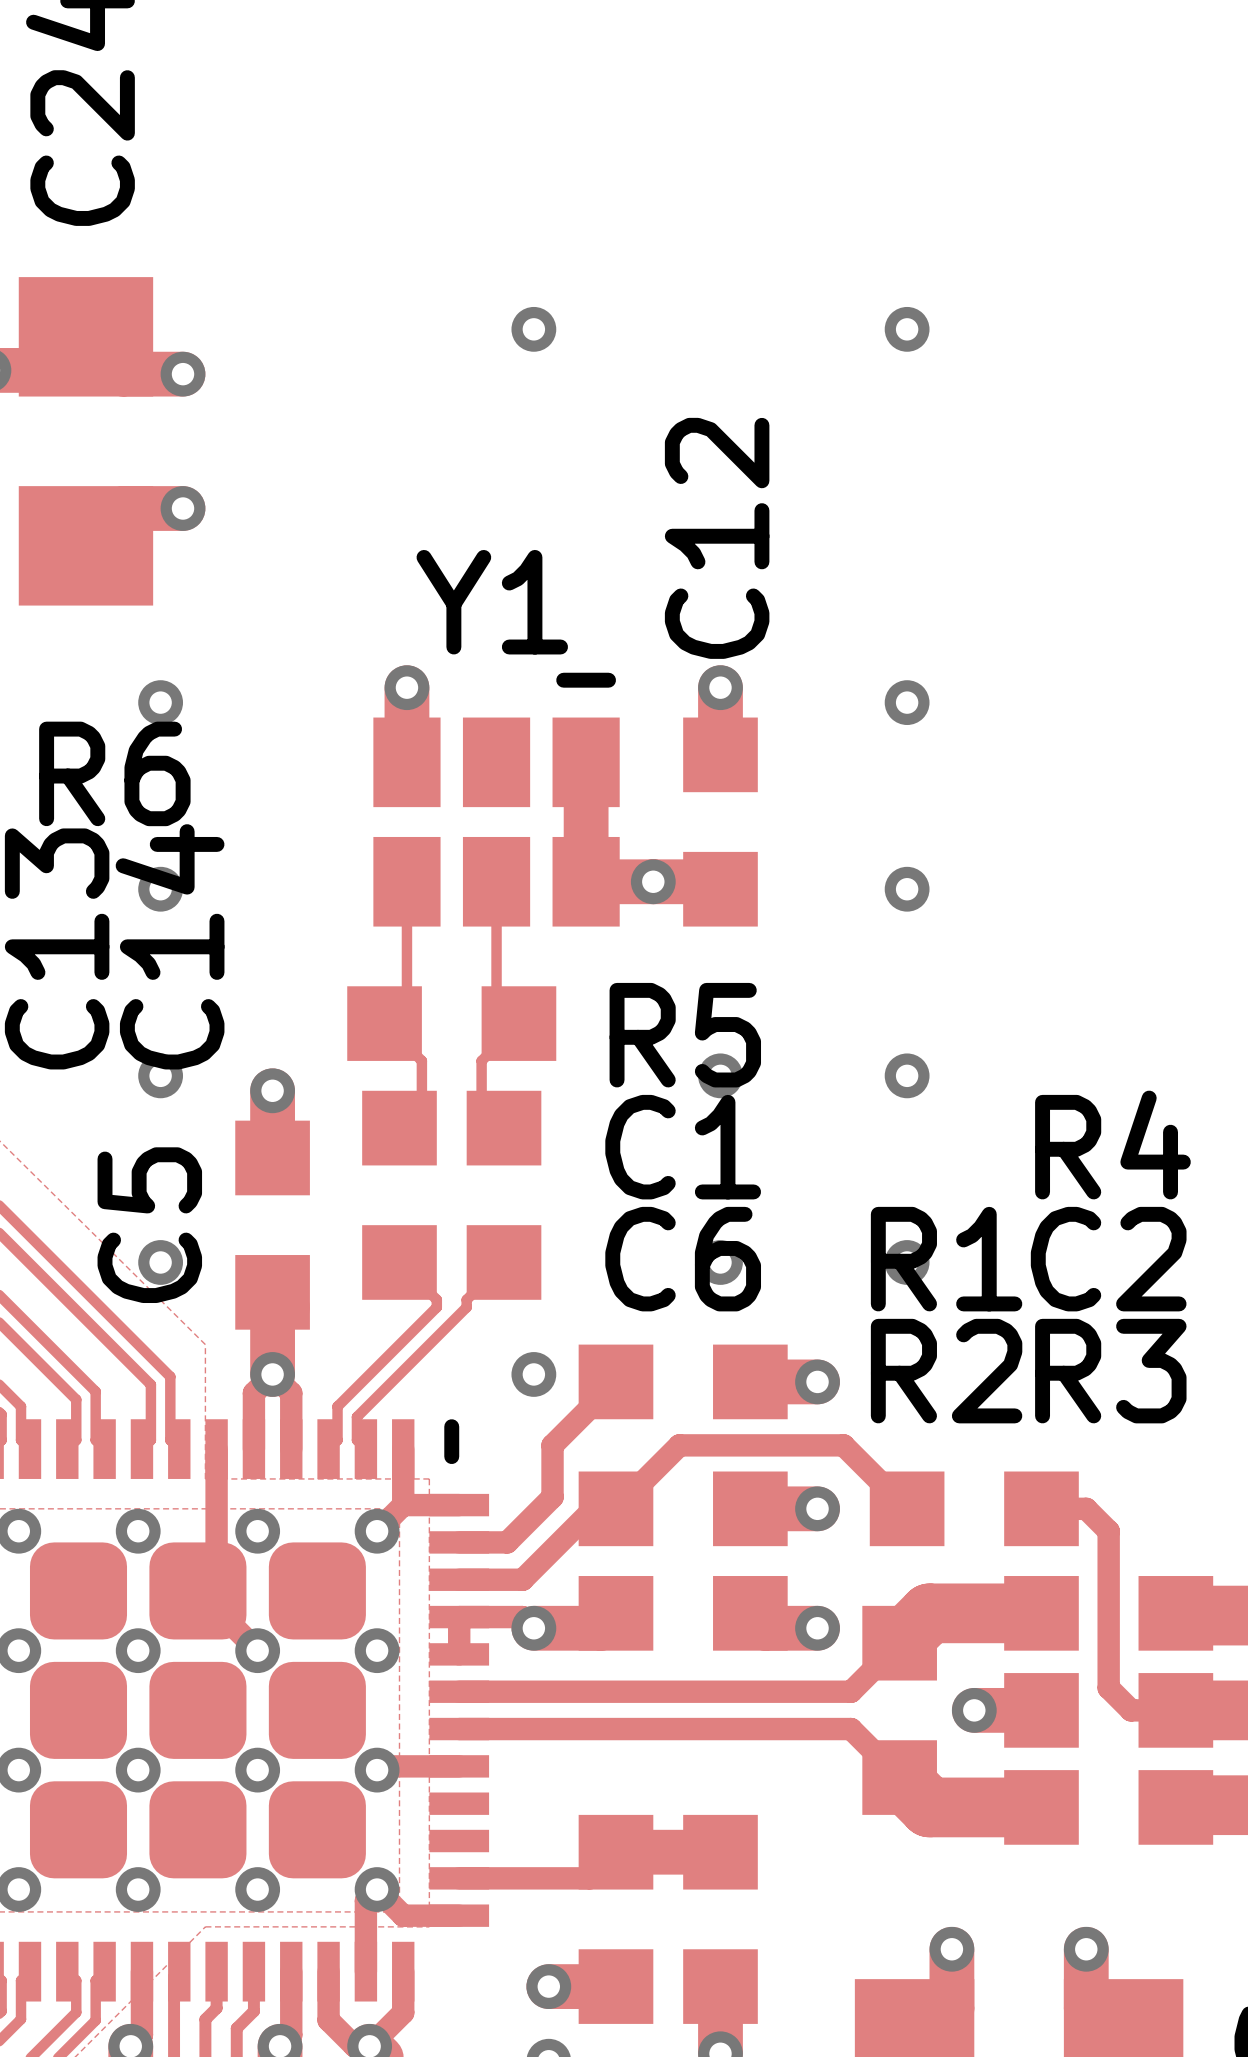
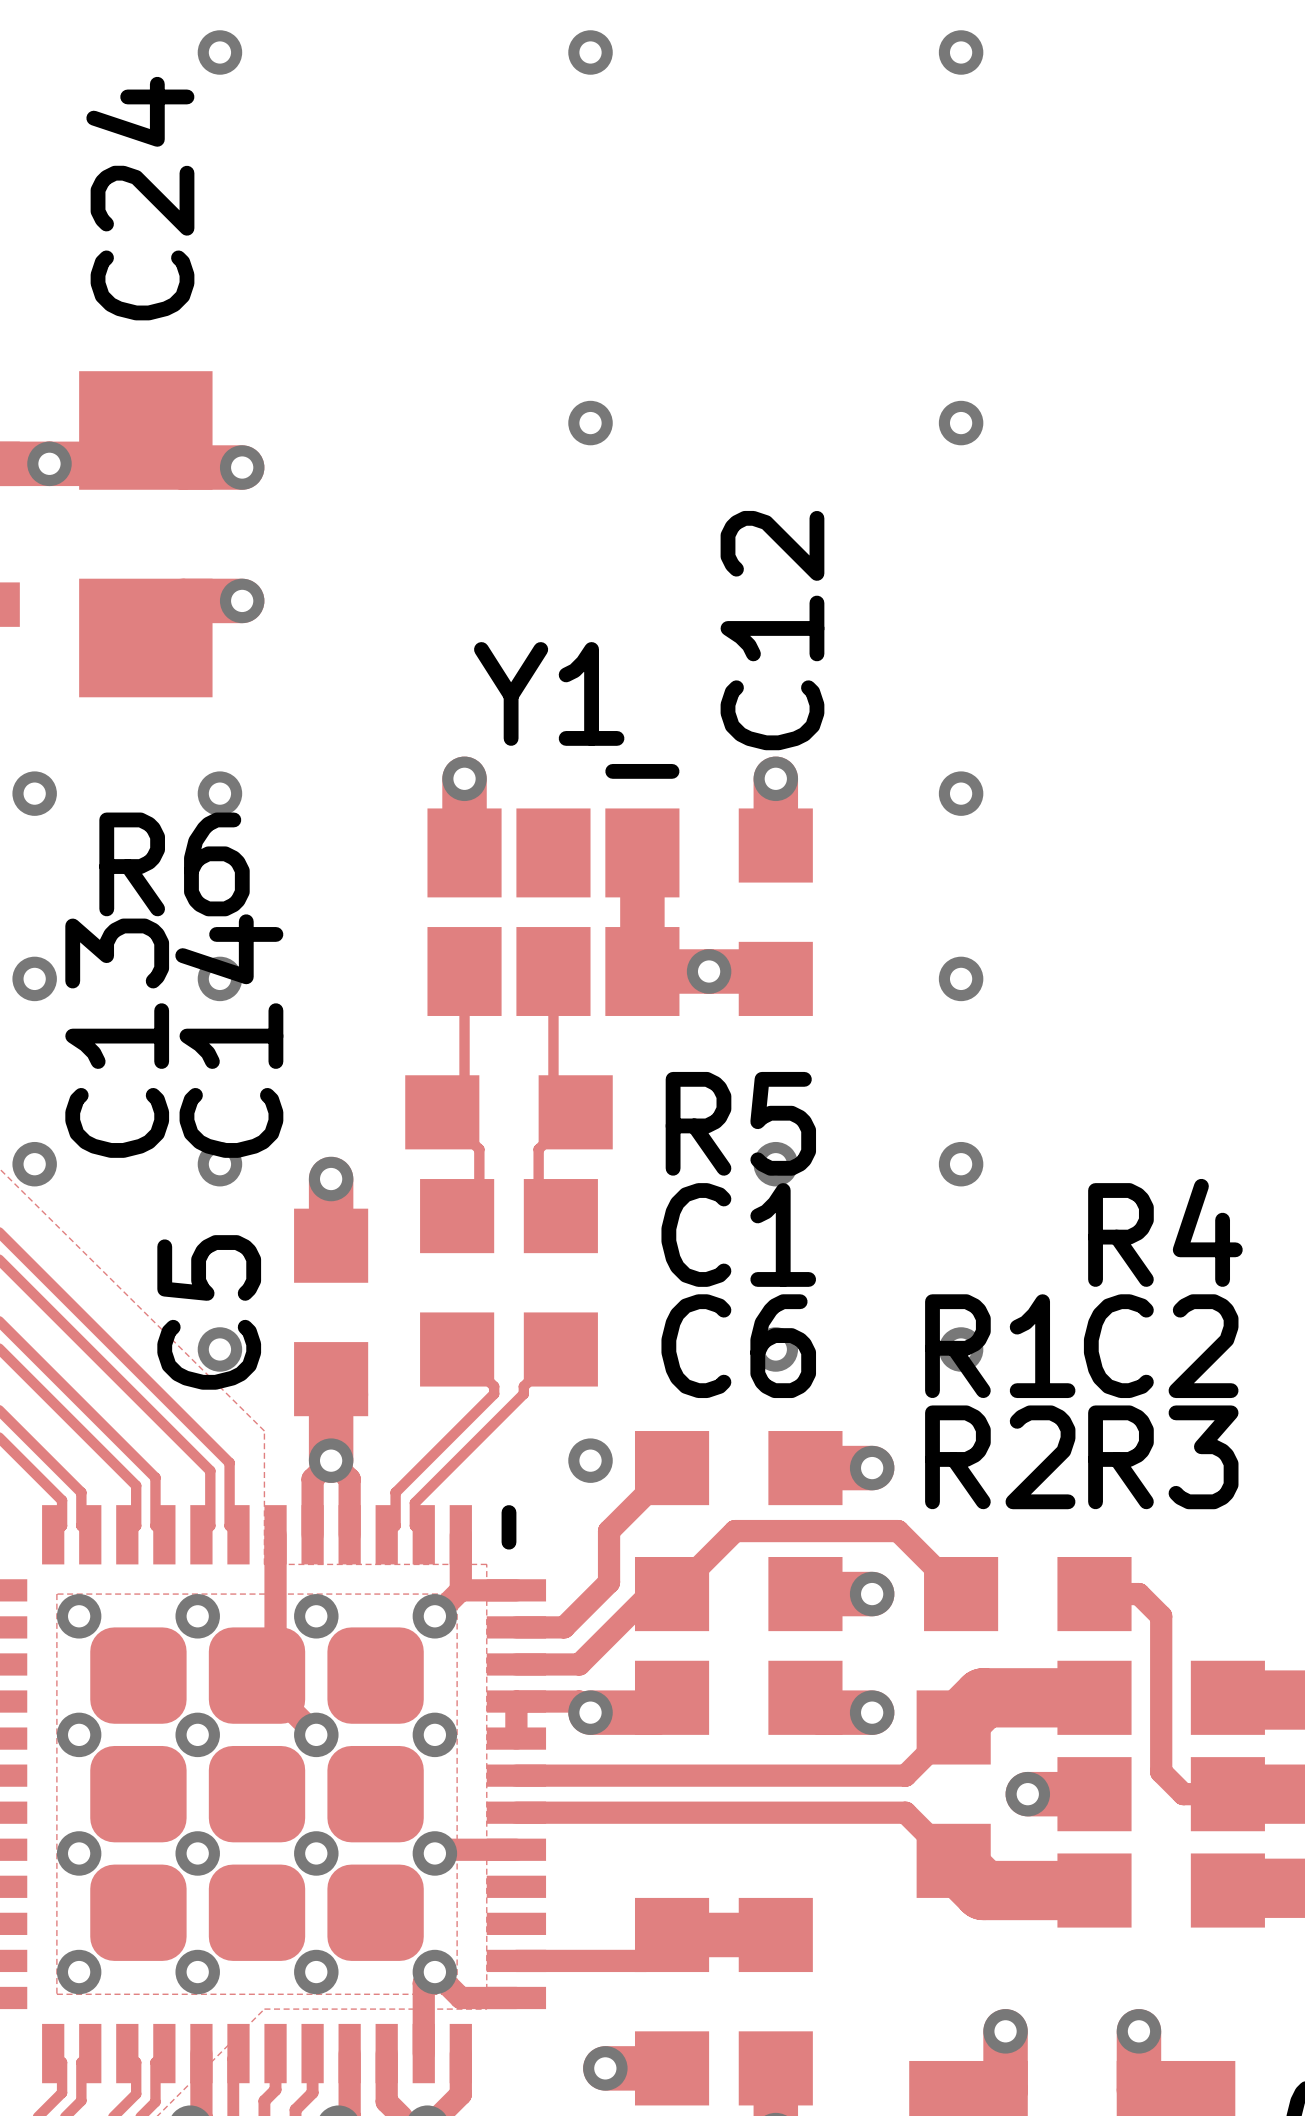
Y1 footprint: [373, 672, 620, 927] -> [427, 763, 680, 1016]

